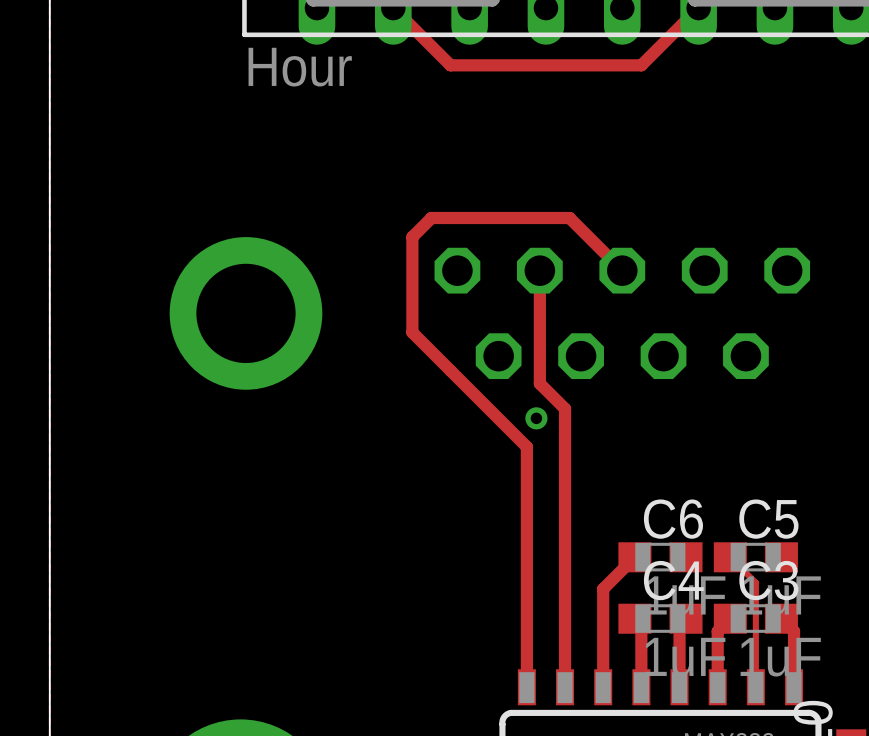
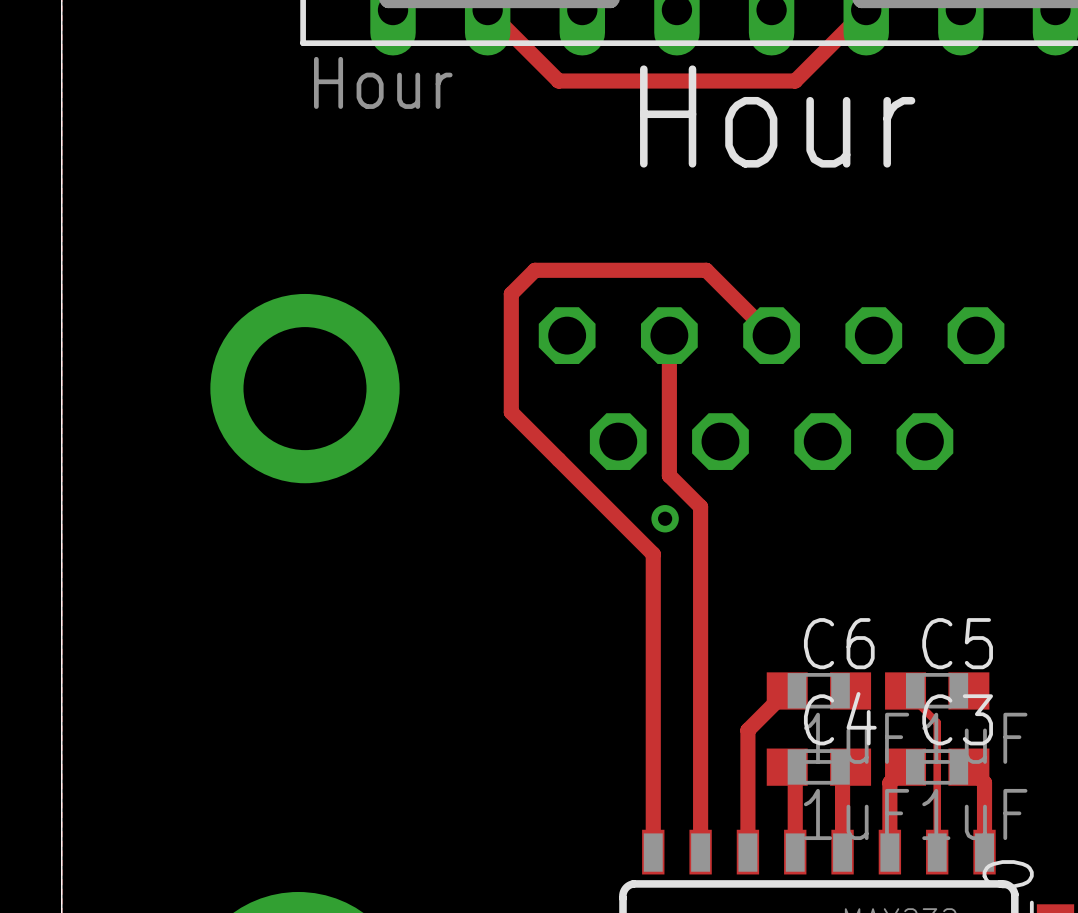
text: none -> Hour (777, 116)

